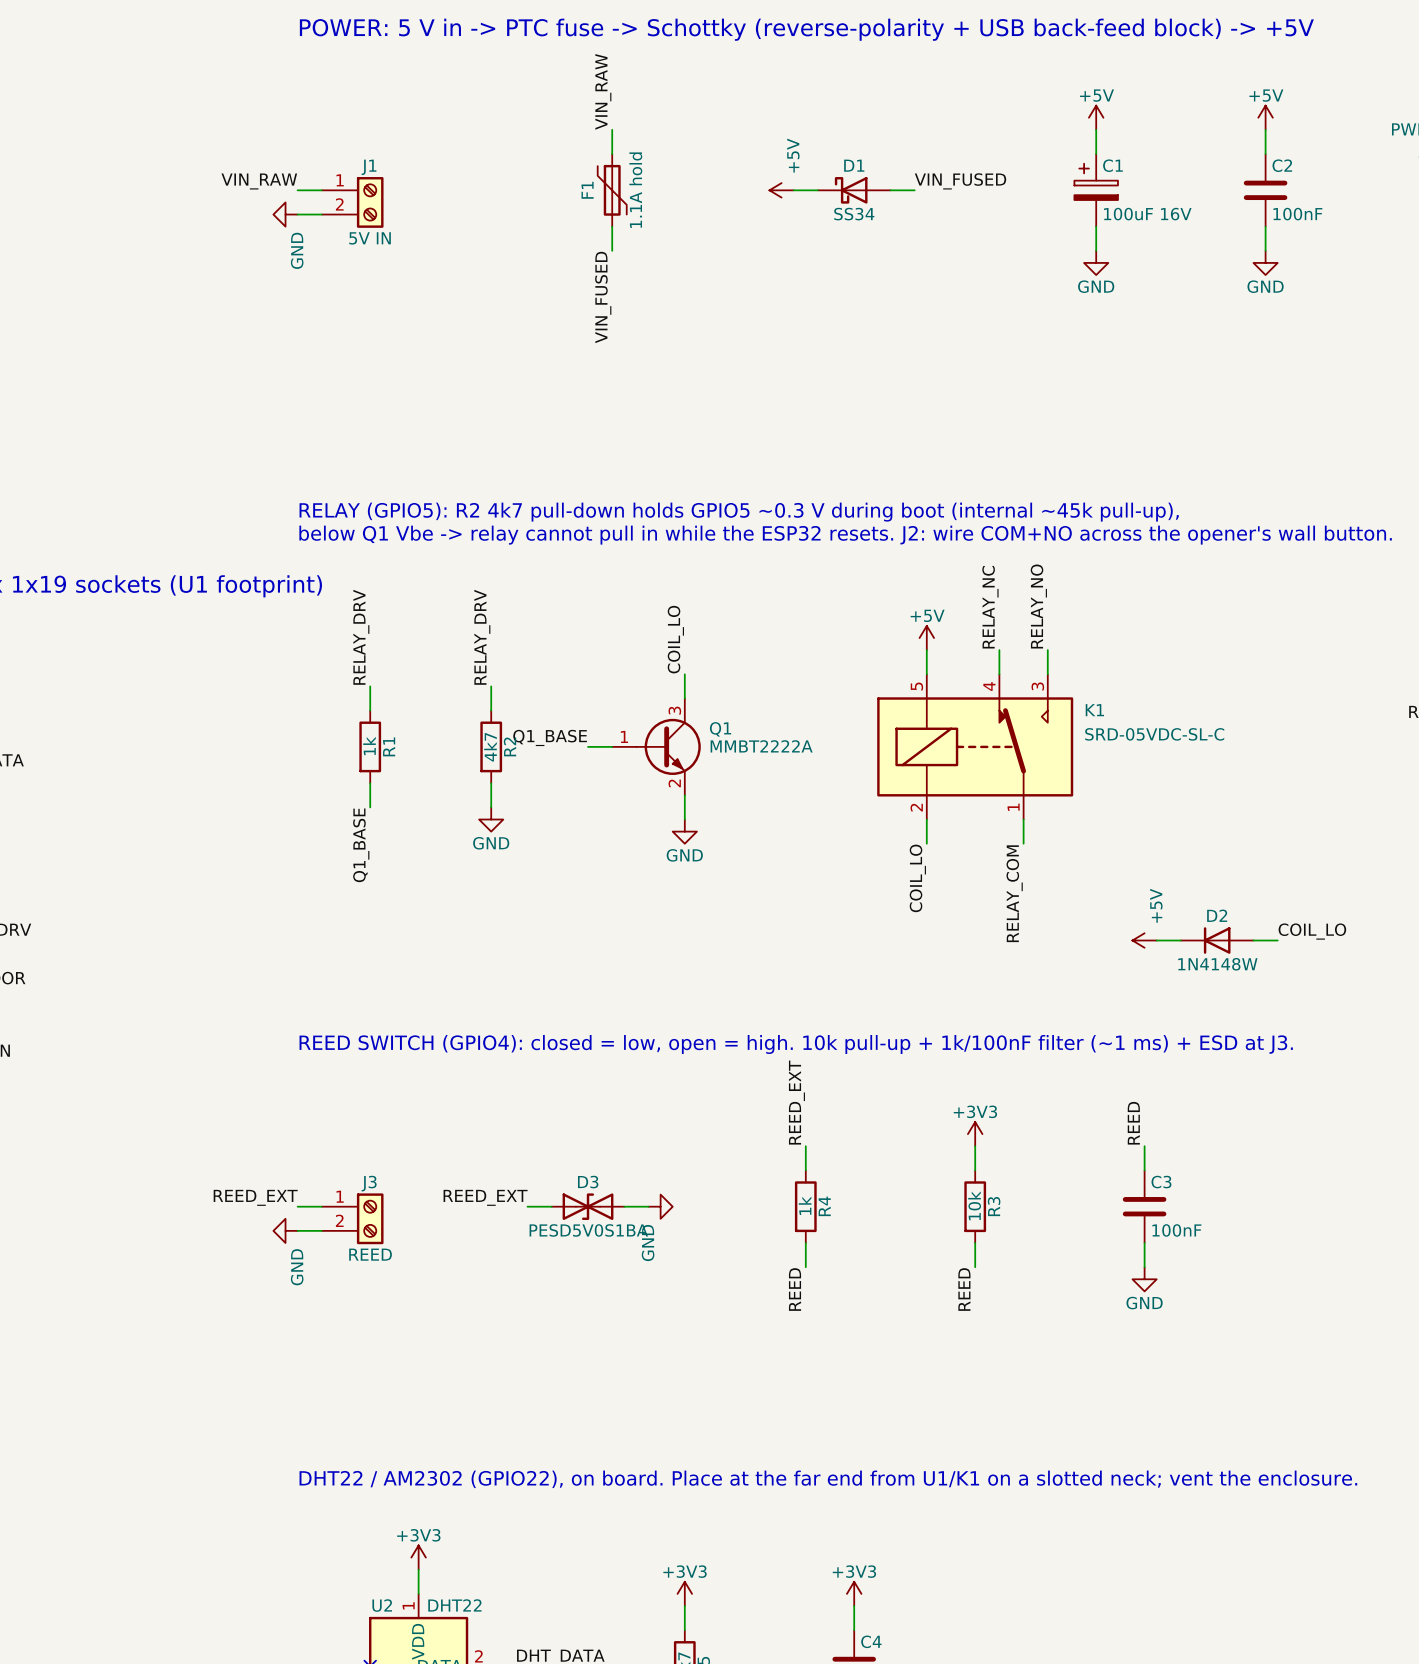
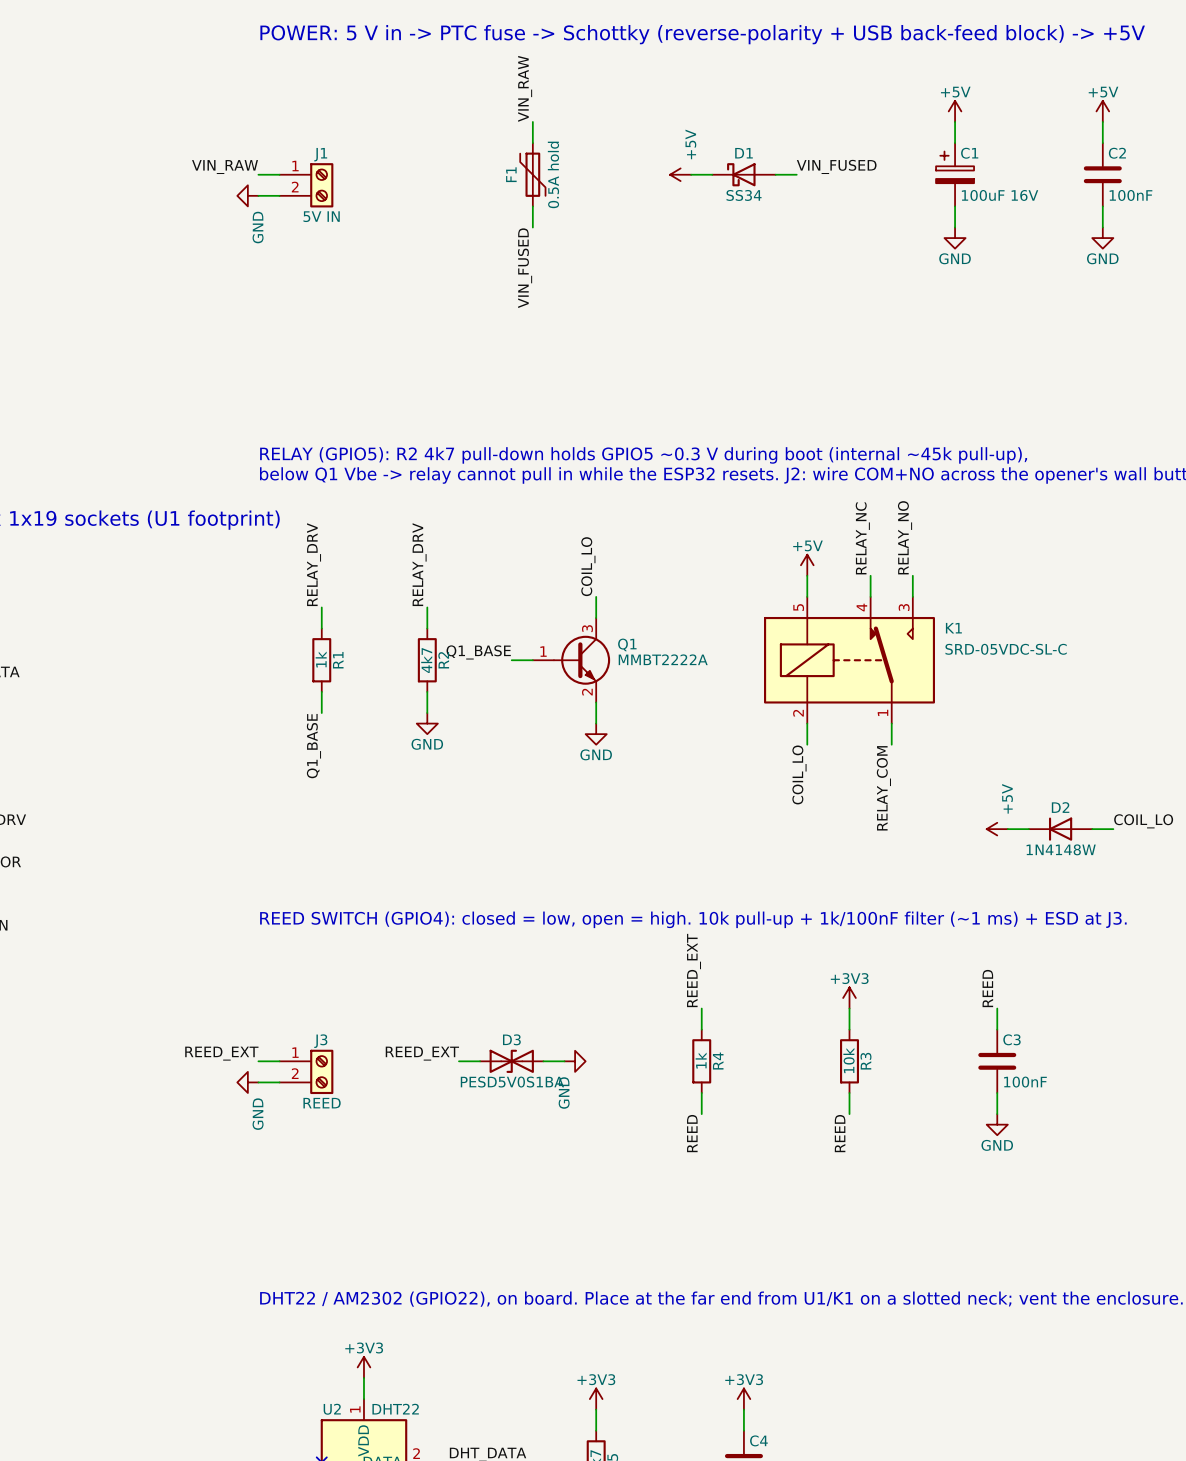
F1 value: 1.1A hold (635, 190) -> 0.5A hold (553, 174)

